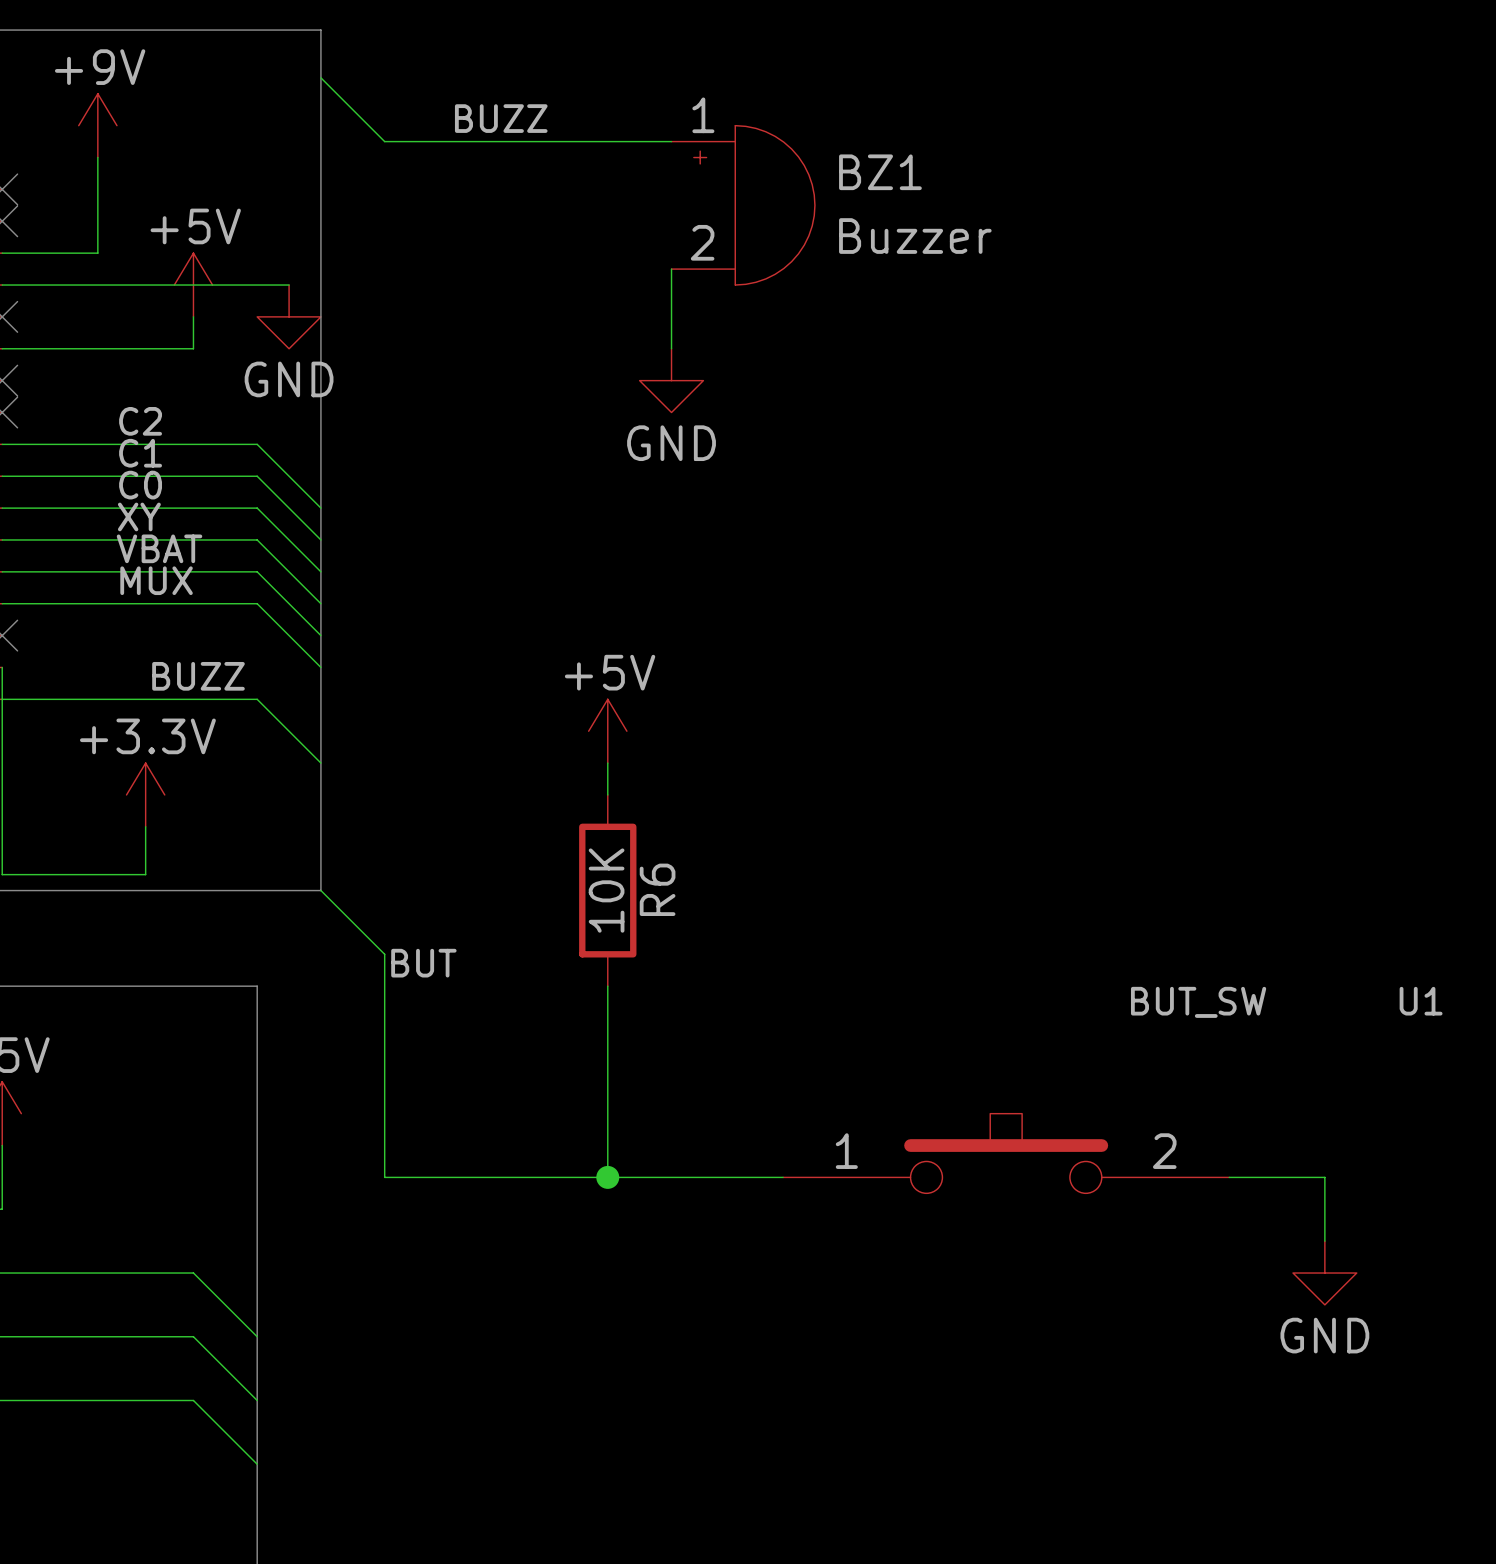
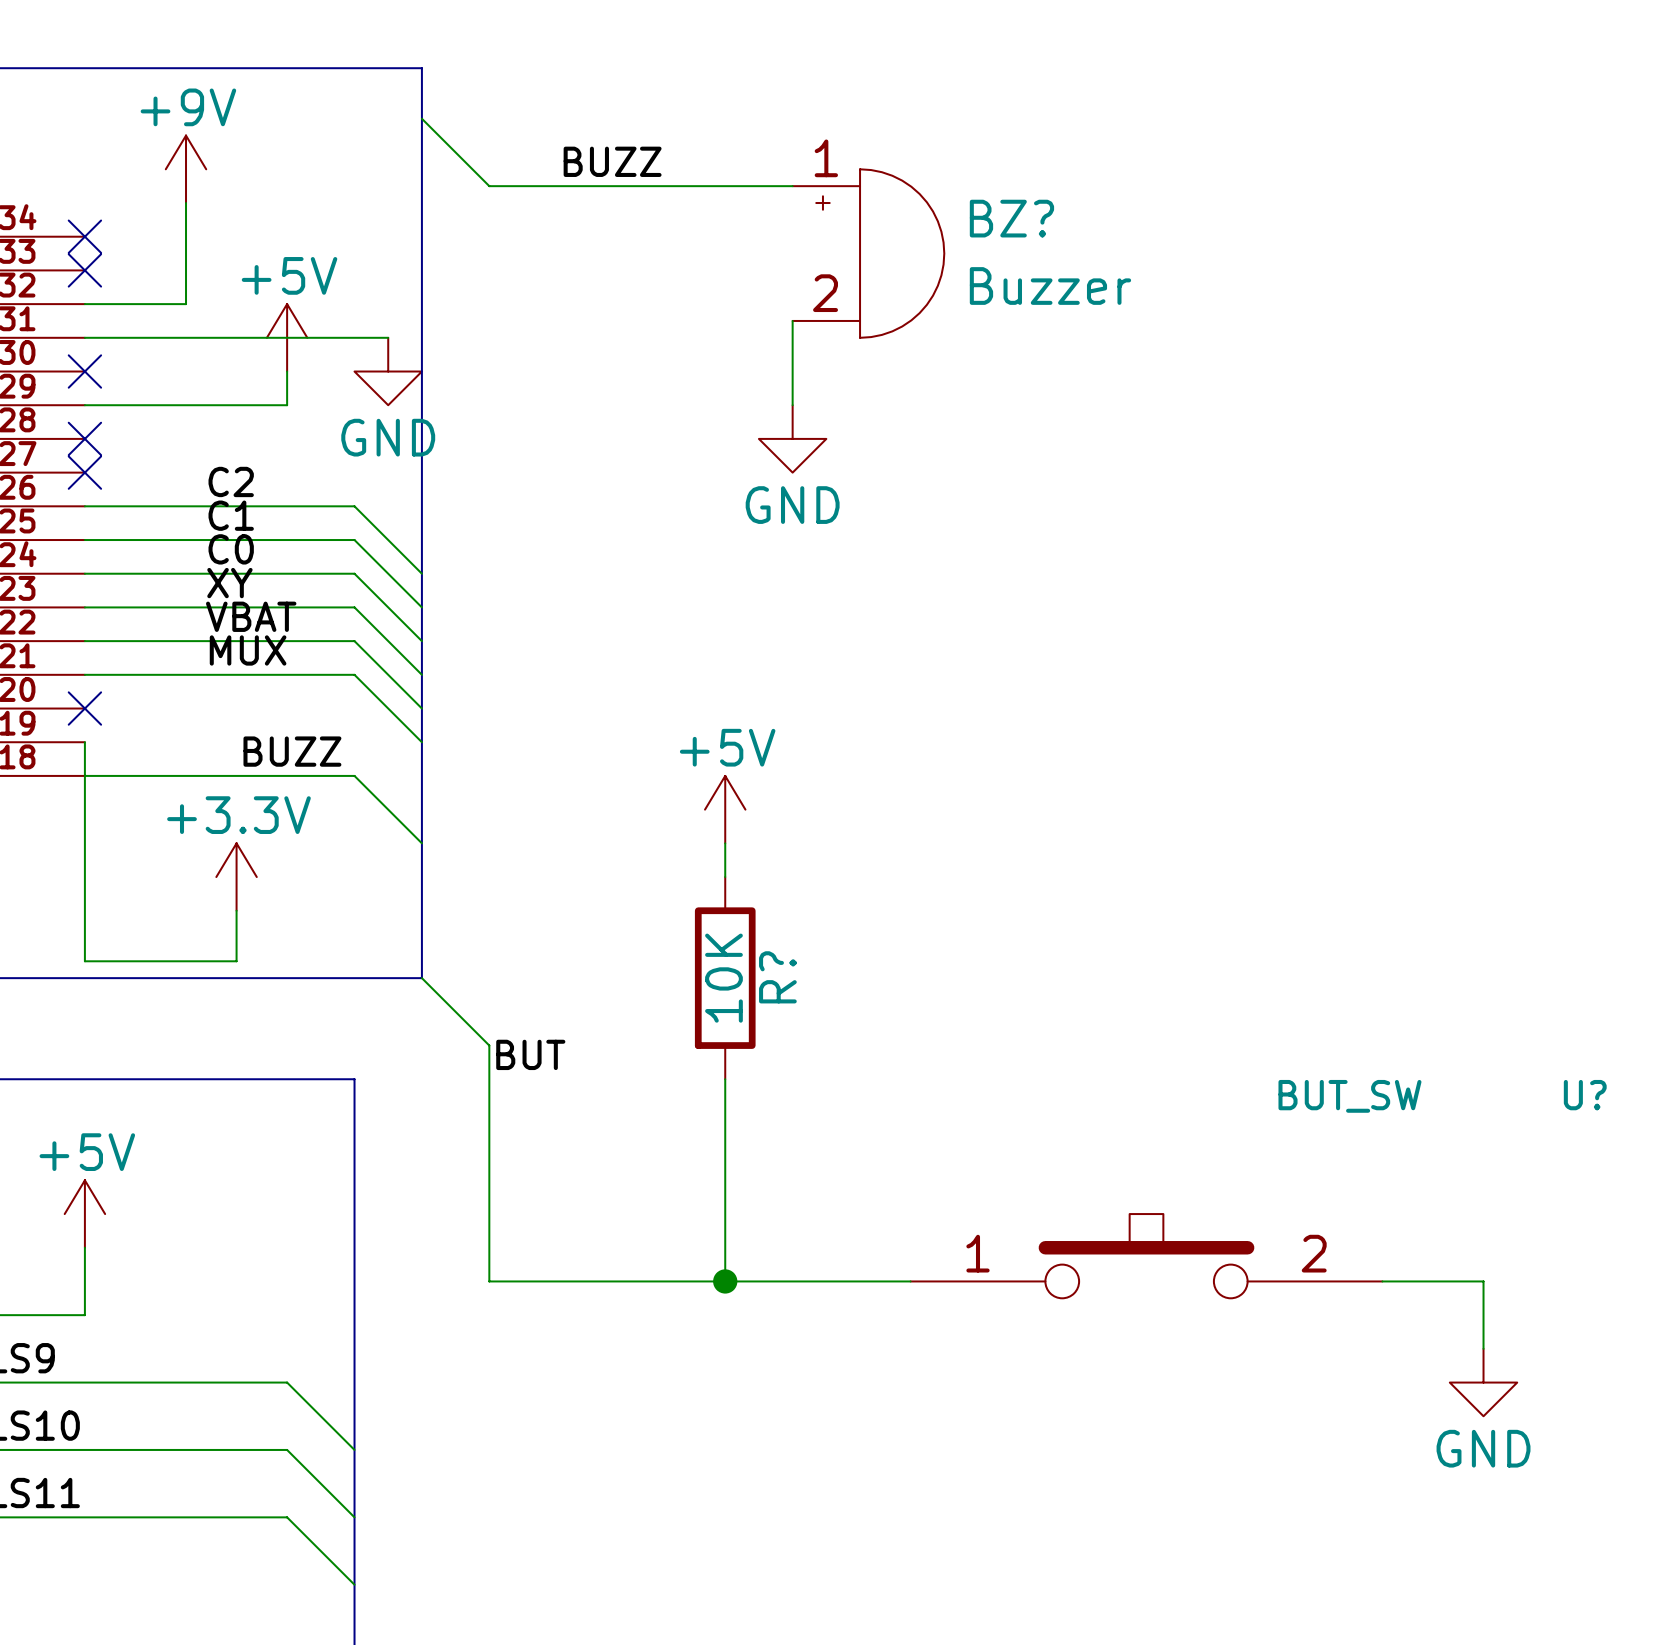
BZ1 name: BZ1 (880, 172) -> BZ? (1011, 218)
R6 name: R6 (657, 889) -> R? (777, 977)
U1 name: U1 (1421, 1001) -> U? (1585, 1095)

